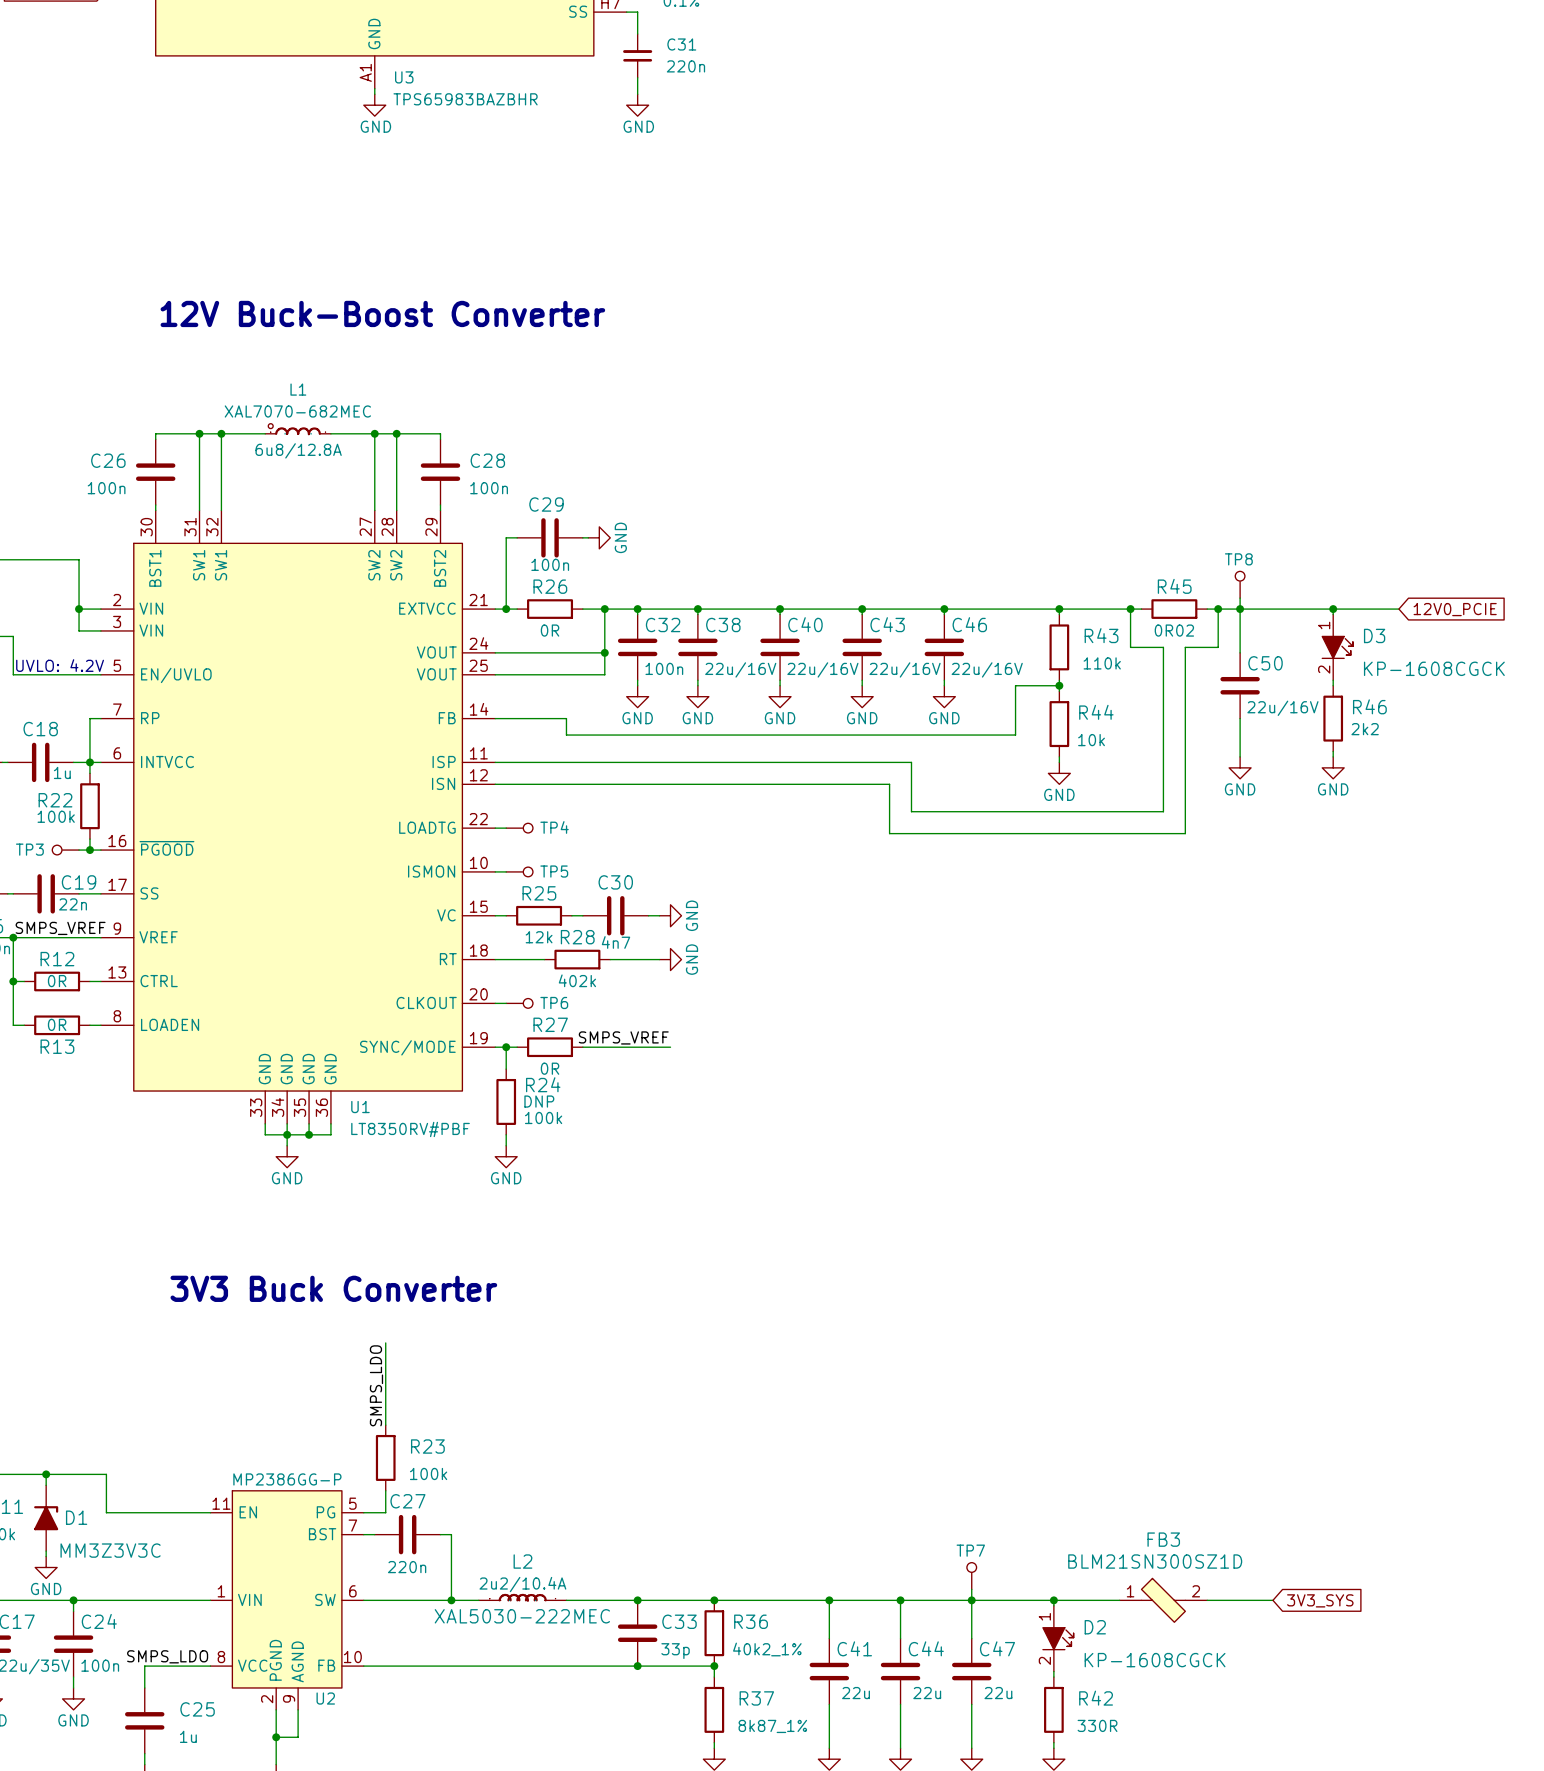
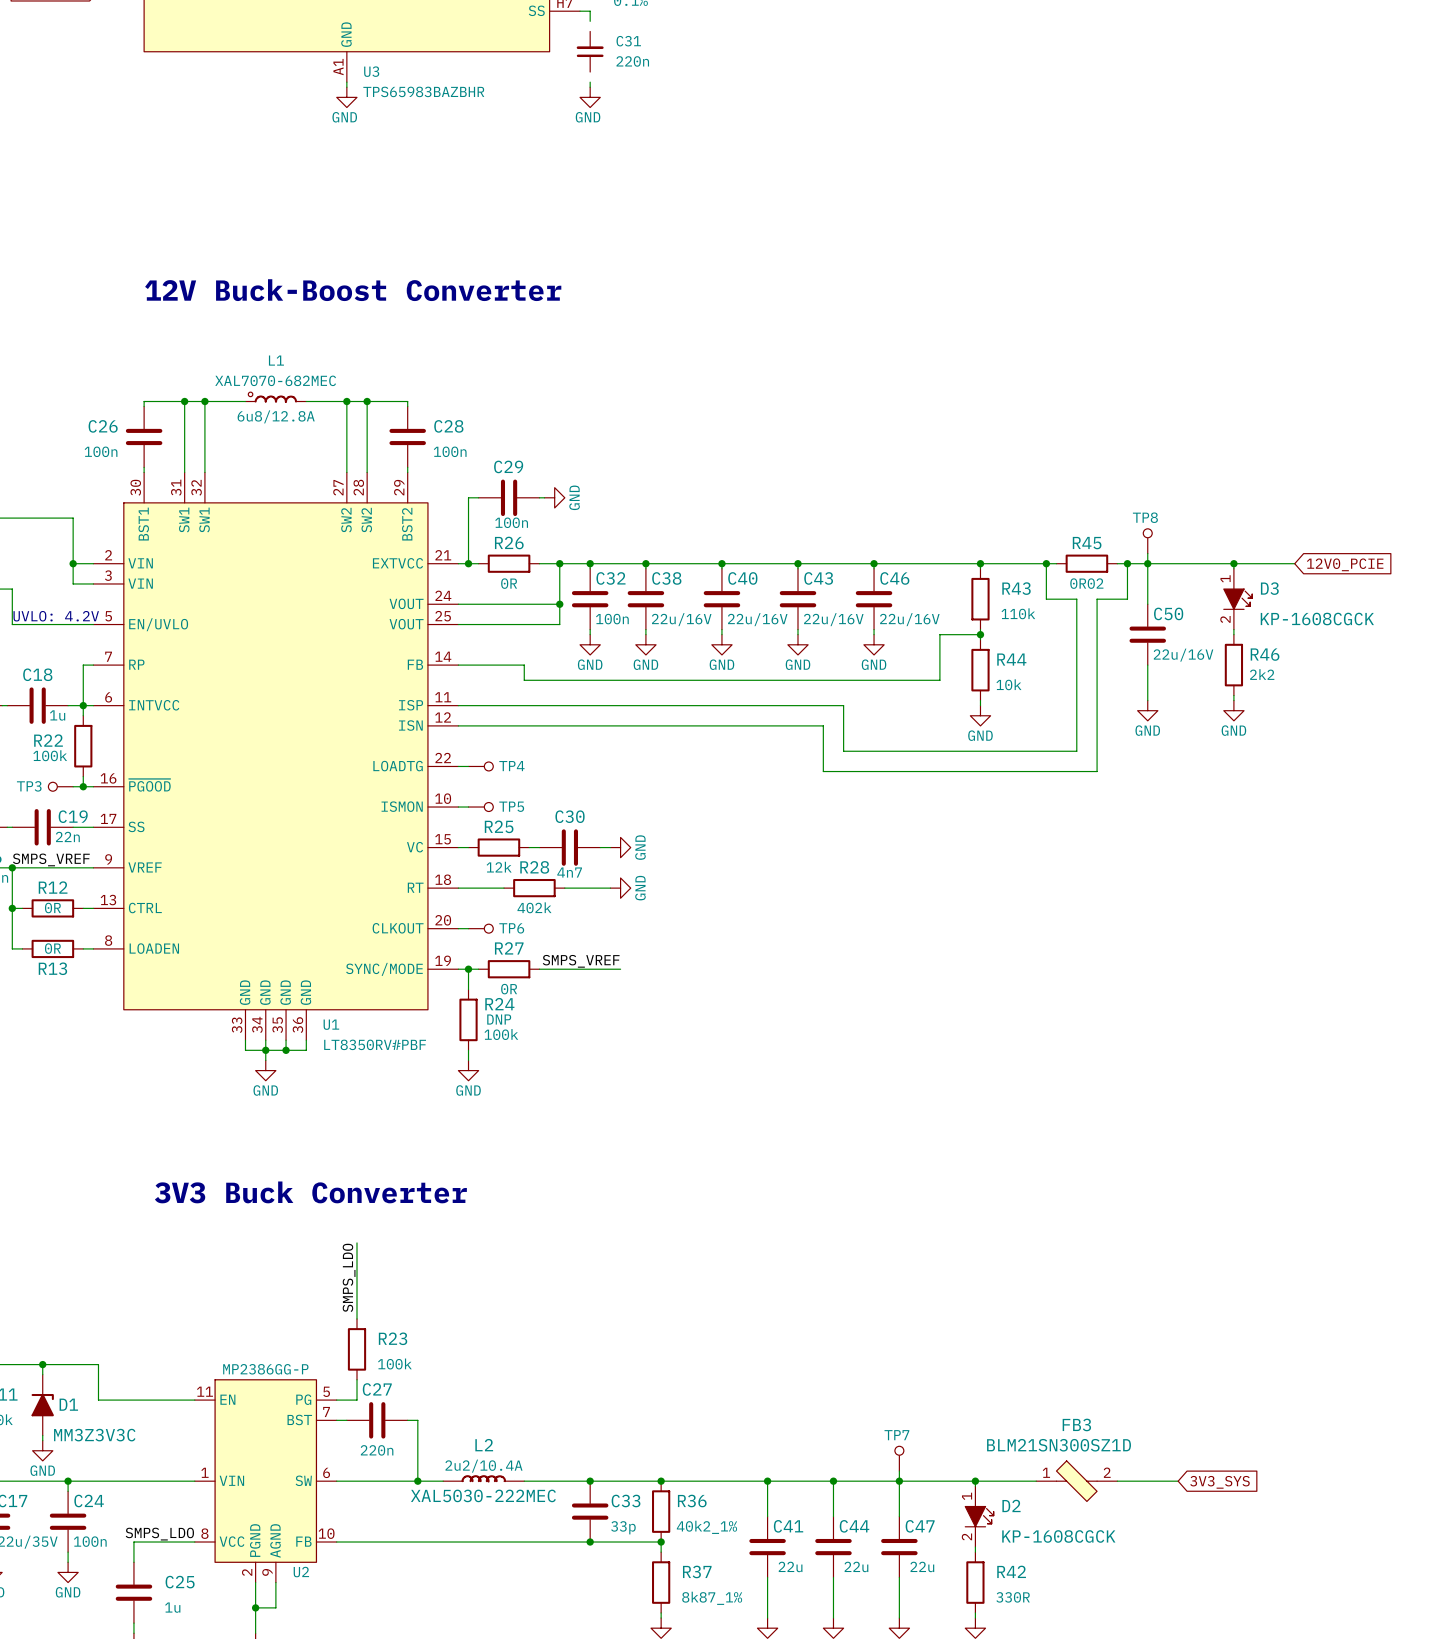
wire: (637, 23) (637, 34) -> none
wire: (637, 77) (637, 88) -> none

